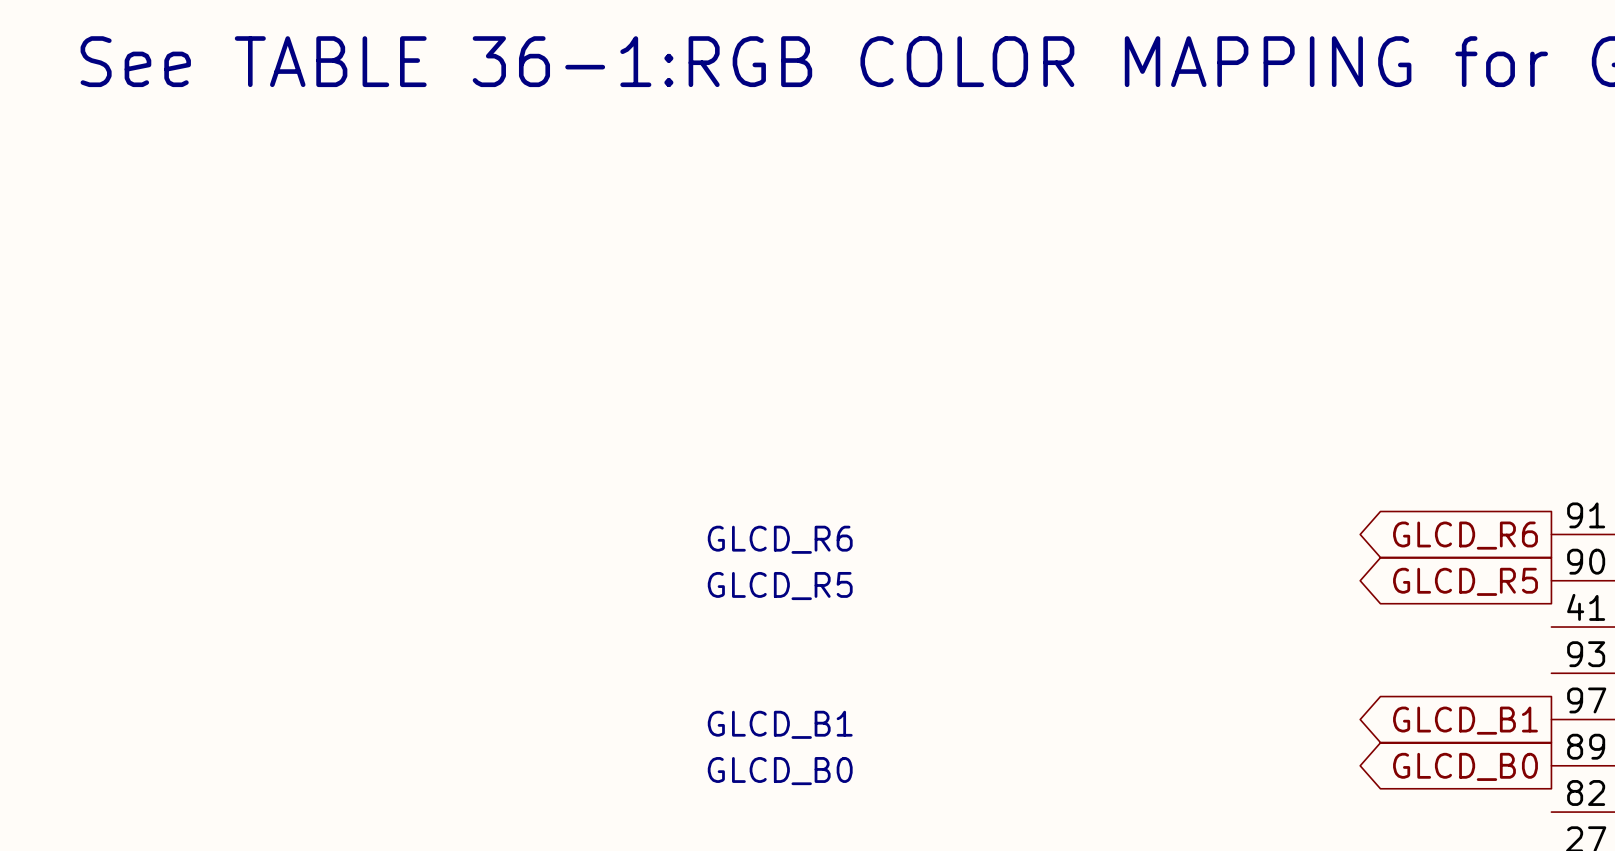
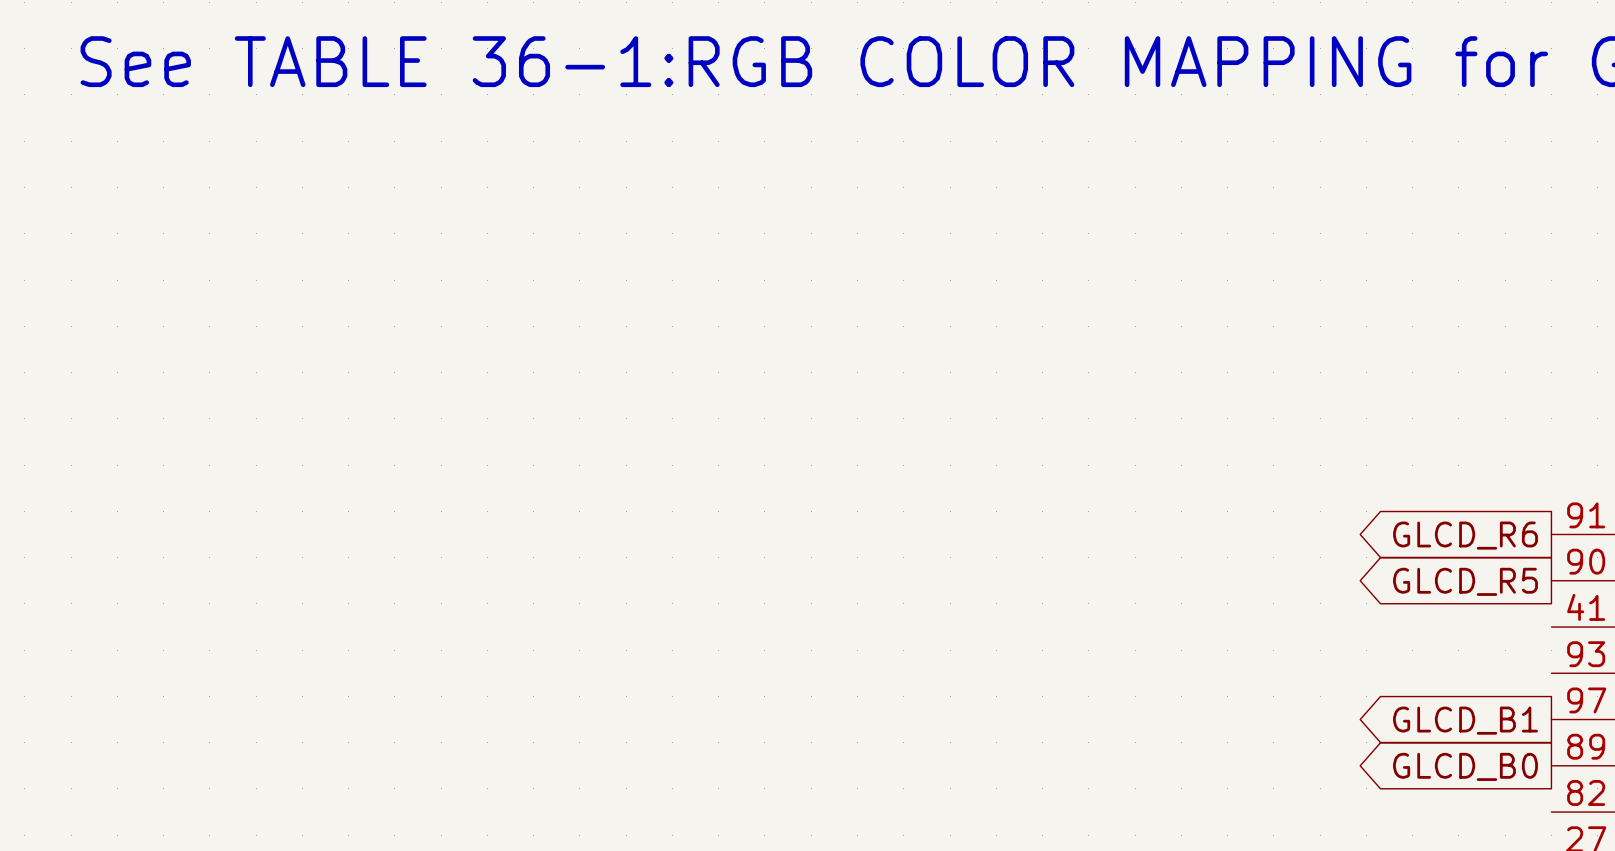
text: GLCD_R6 (780, 539) -> none
text: GLCD_R5 (780, 586) -> none
text: GLCD_B1 (780, 724) -> none
text: GLCD_B0 (780, 771) -> none

